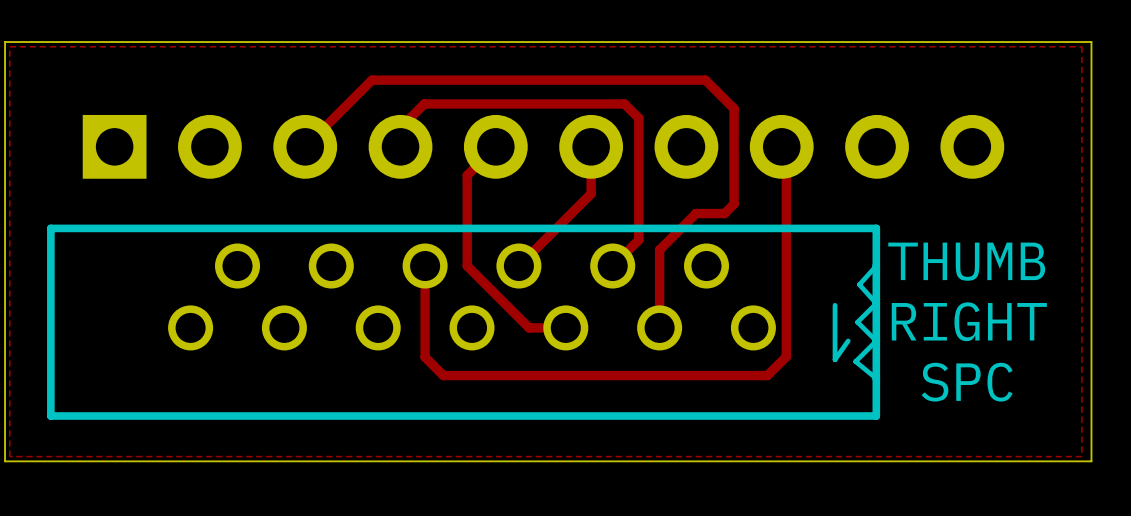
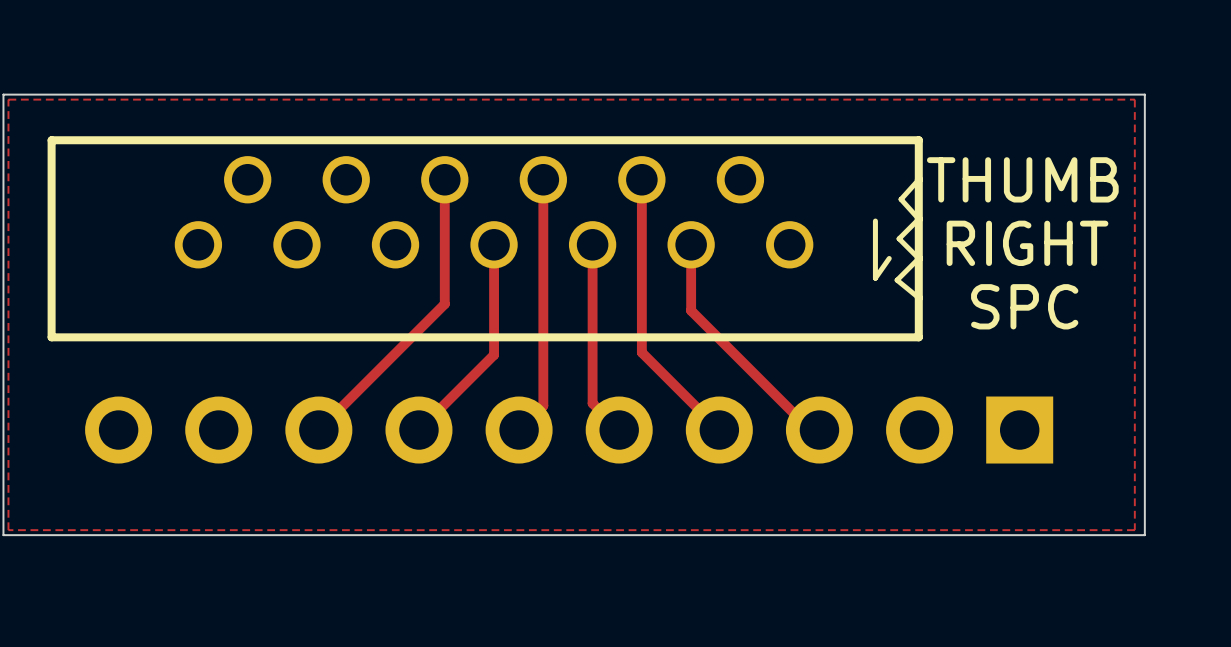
track: none -> (444, 179) (444, 304) (318, 430)
track: none -> (543, 179) (543, 405) (519, 430)
track: none -> (641, 179) (641, 352) (719, 430)
track: (305, 146) (371, 80) (705, 80) (734, 108) (734, 204) (724, 213) (695, 213) (659, 249) (659, 327) -> none
track: (400, 146) (400, 127) (424, 103) (624, 103) (638, 118) (638, 239) (612, 266) -> none
track: (495, 146) (467, 175) (467, 265) (529, 327) (565, 327) -> none
part: (543, 146) -> none
track: (591, 146) (591, 193) (518, 266) -> none
track: (781, 146) (786, 151) (786, 356) (767, 375) (443, 375) (425, 357) (425, 266) -> none
track: none -> (494, 244) (494, 354) (418, 430)
track: none -> (592, 244) (592, 403) (619, 430)
track: none -> (691, 244) (691, 310) (810, 430) (819, 430)
part position: (463, 322) -> (485, 238)
part: none -> (569, 430)

